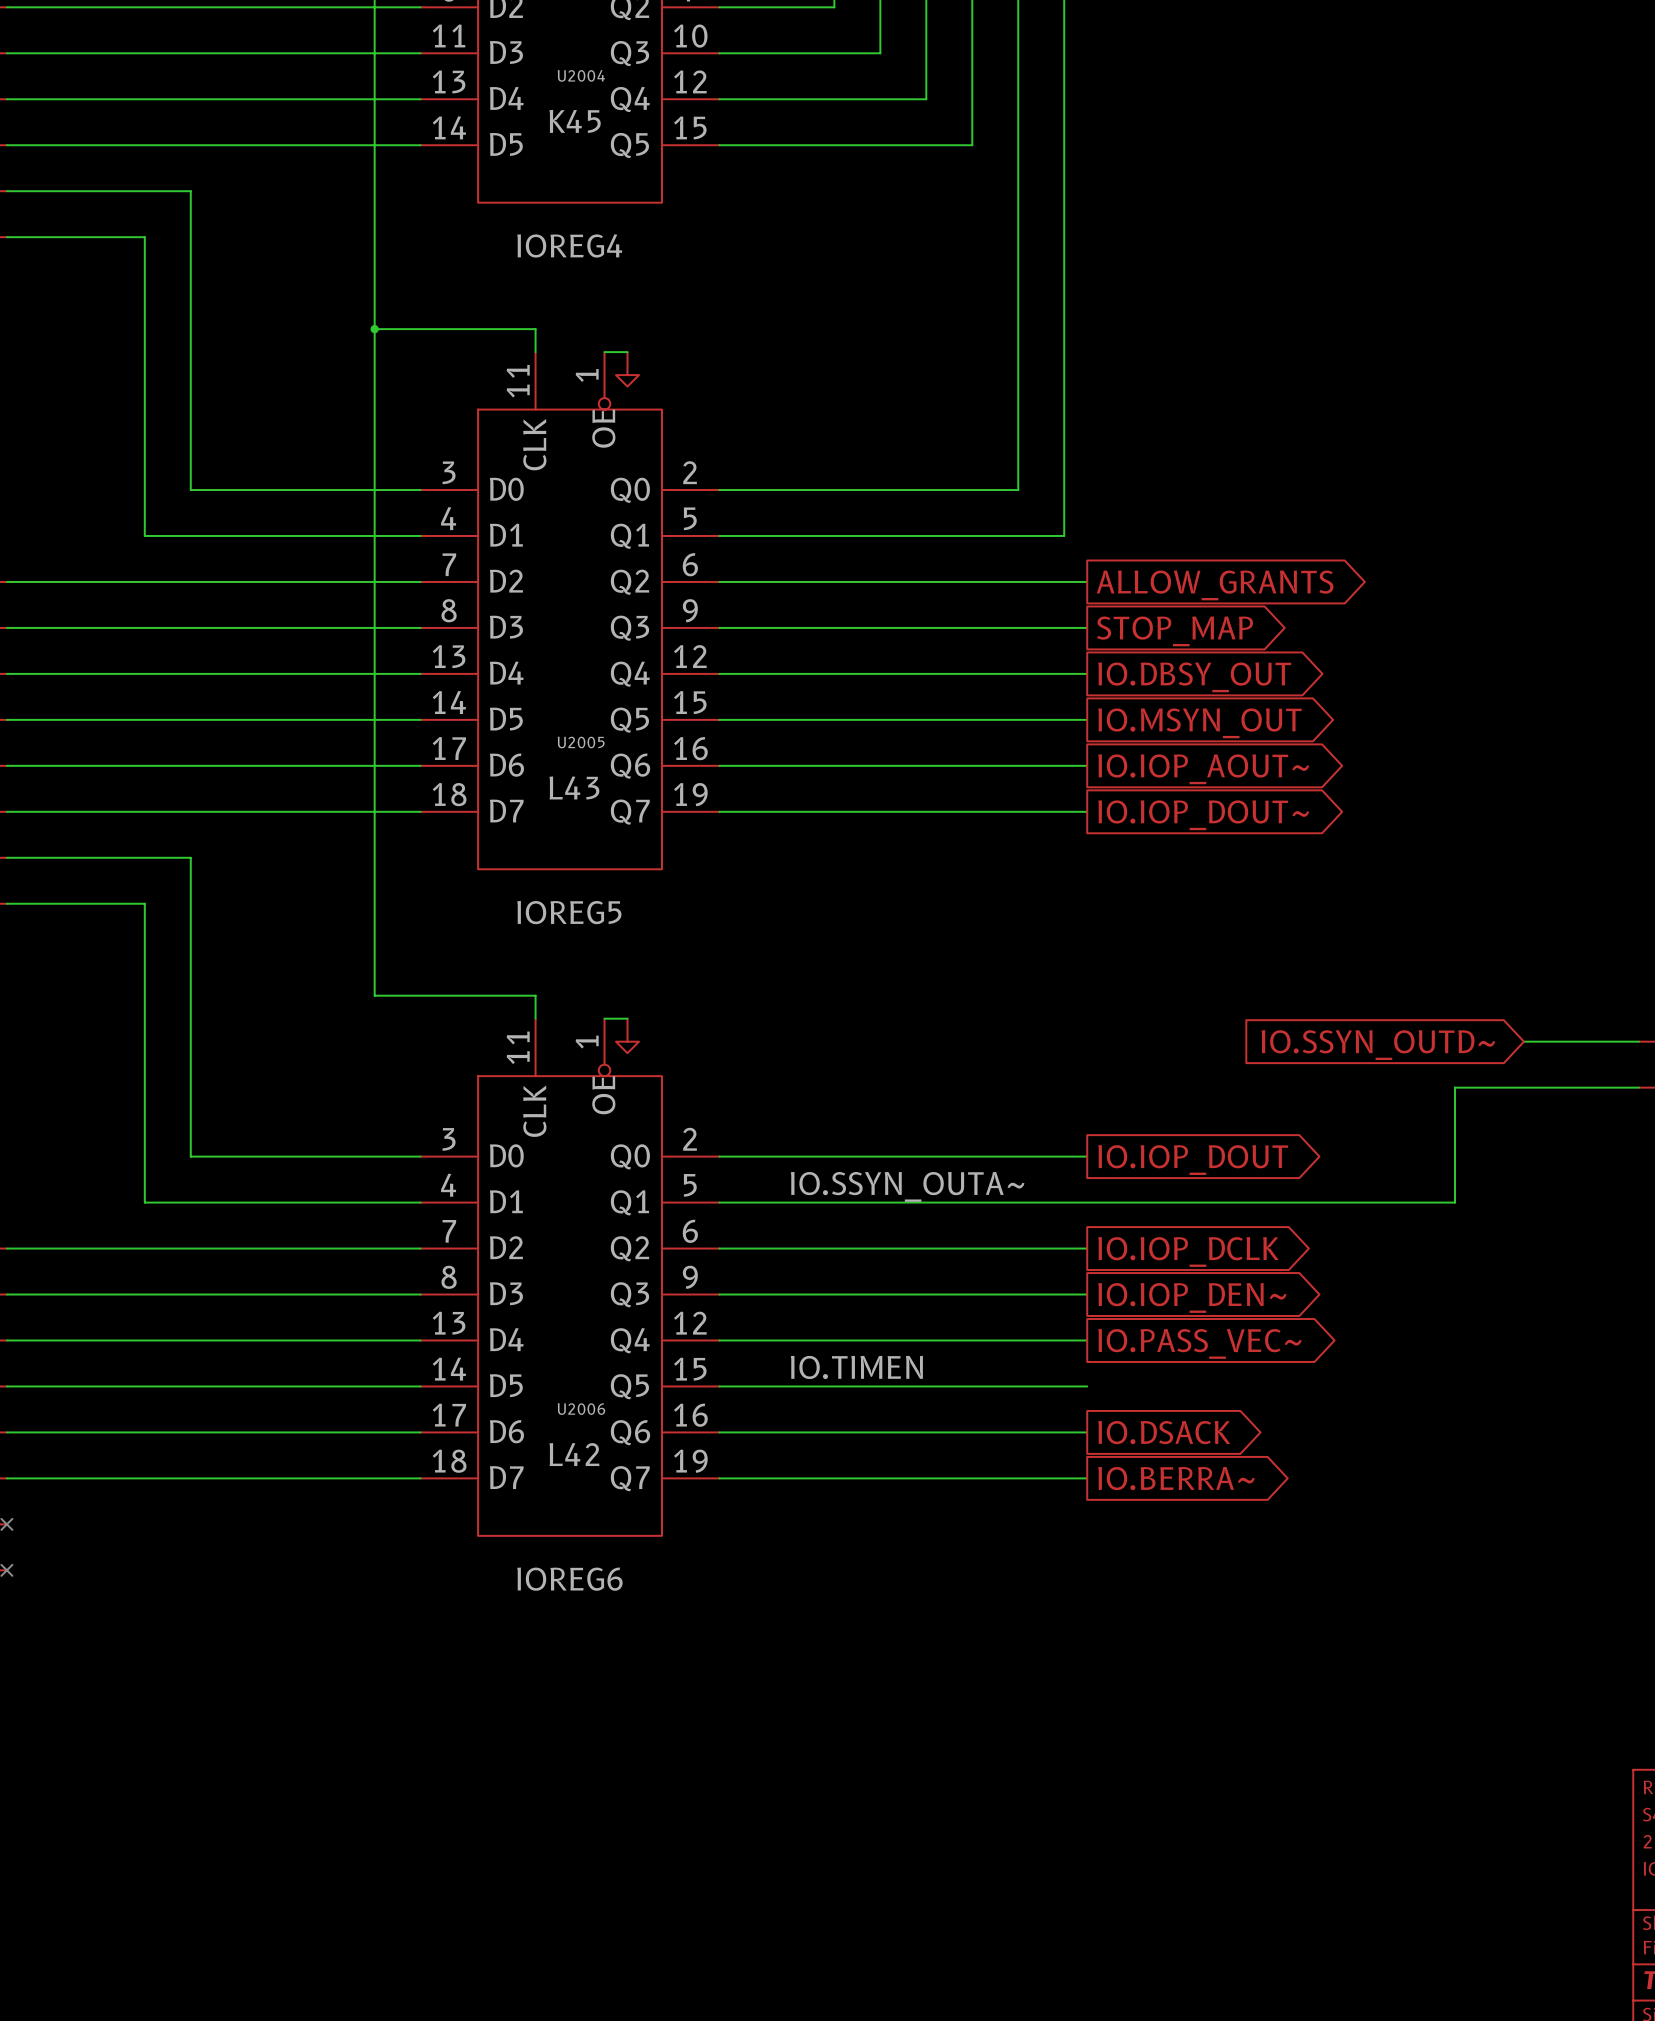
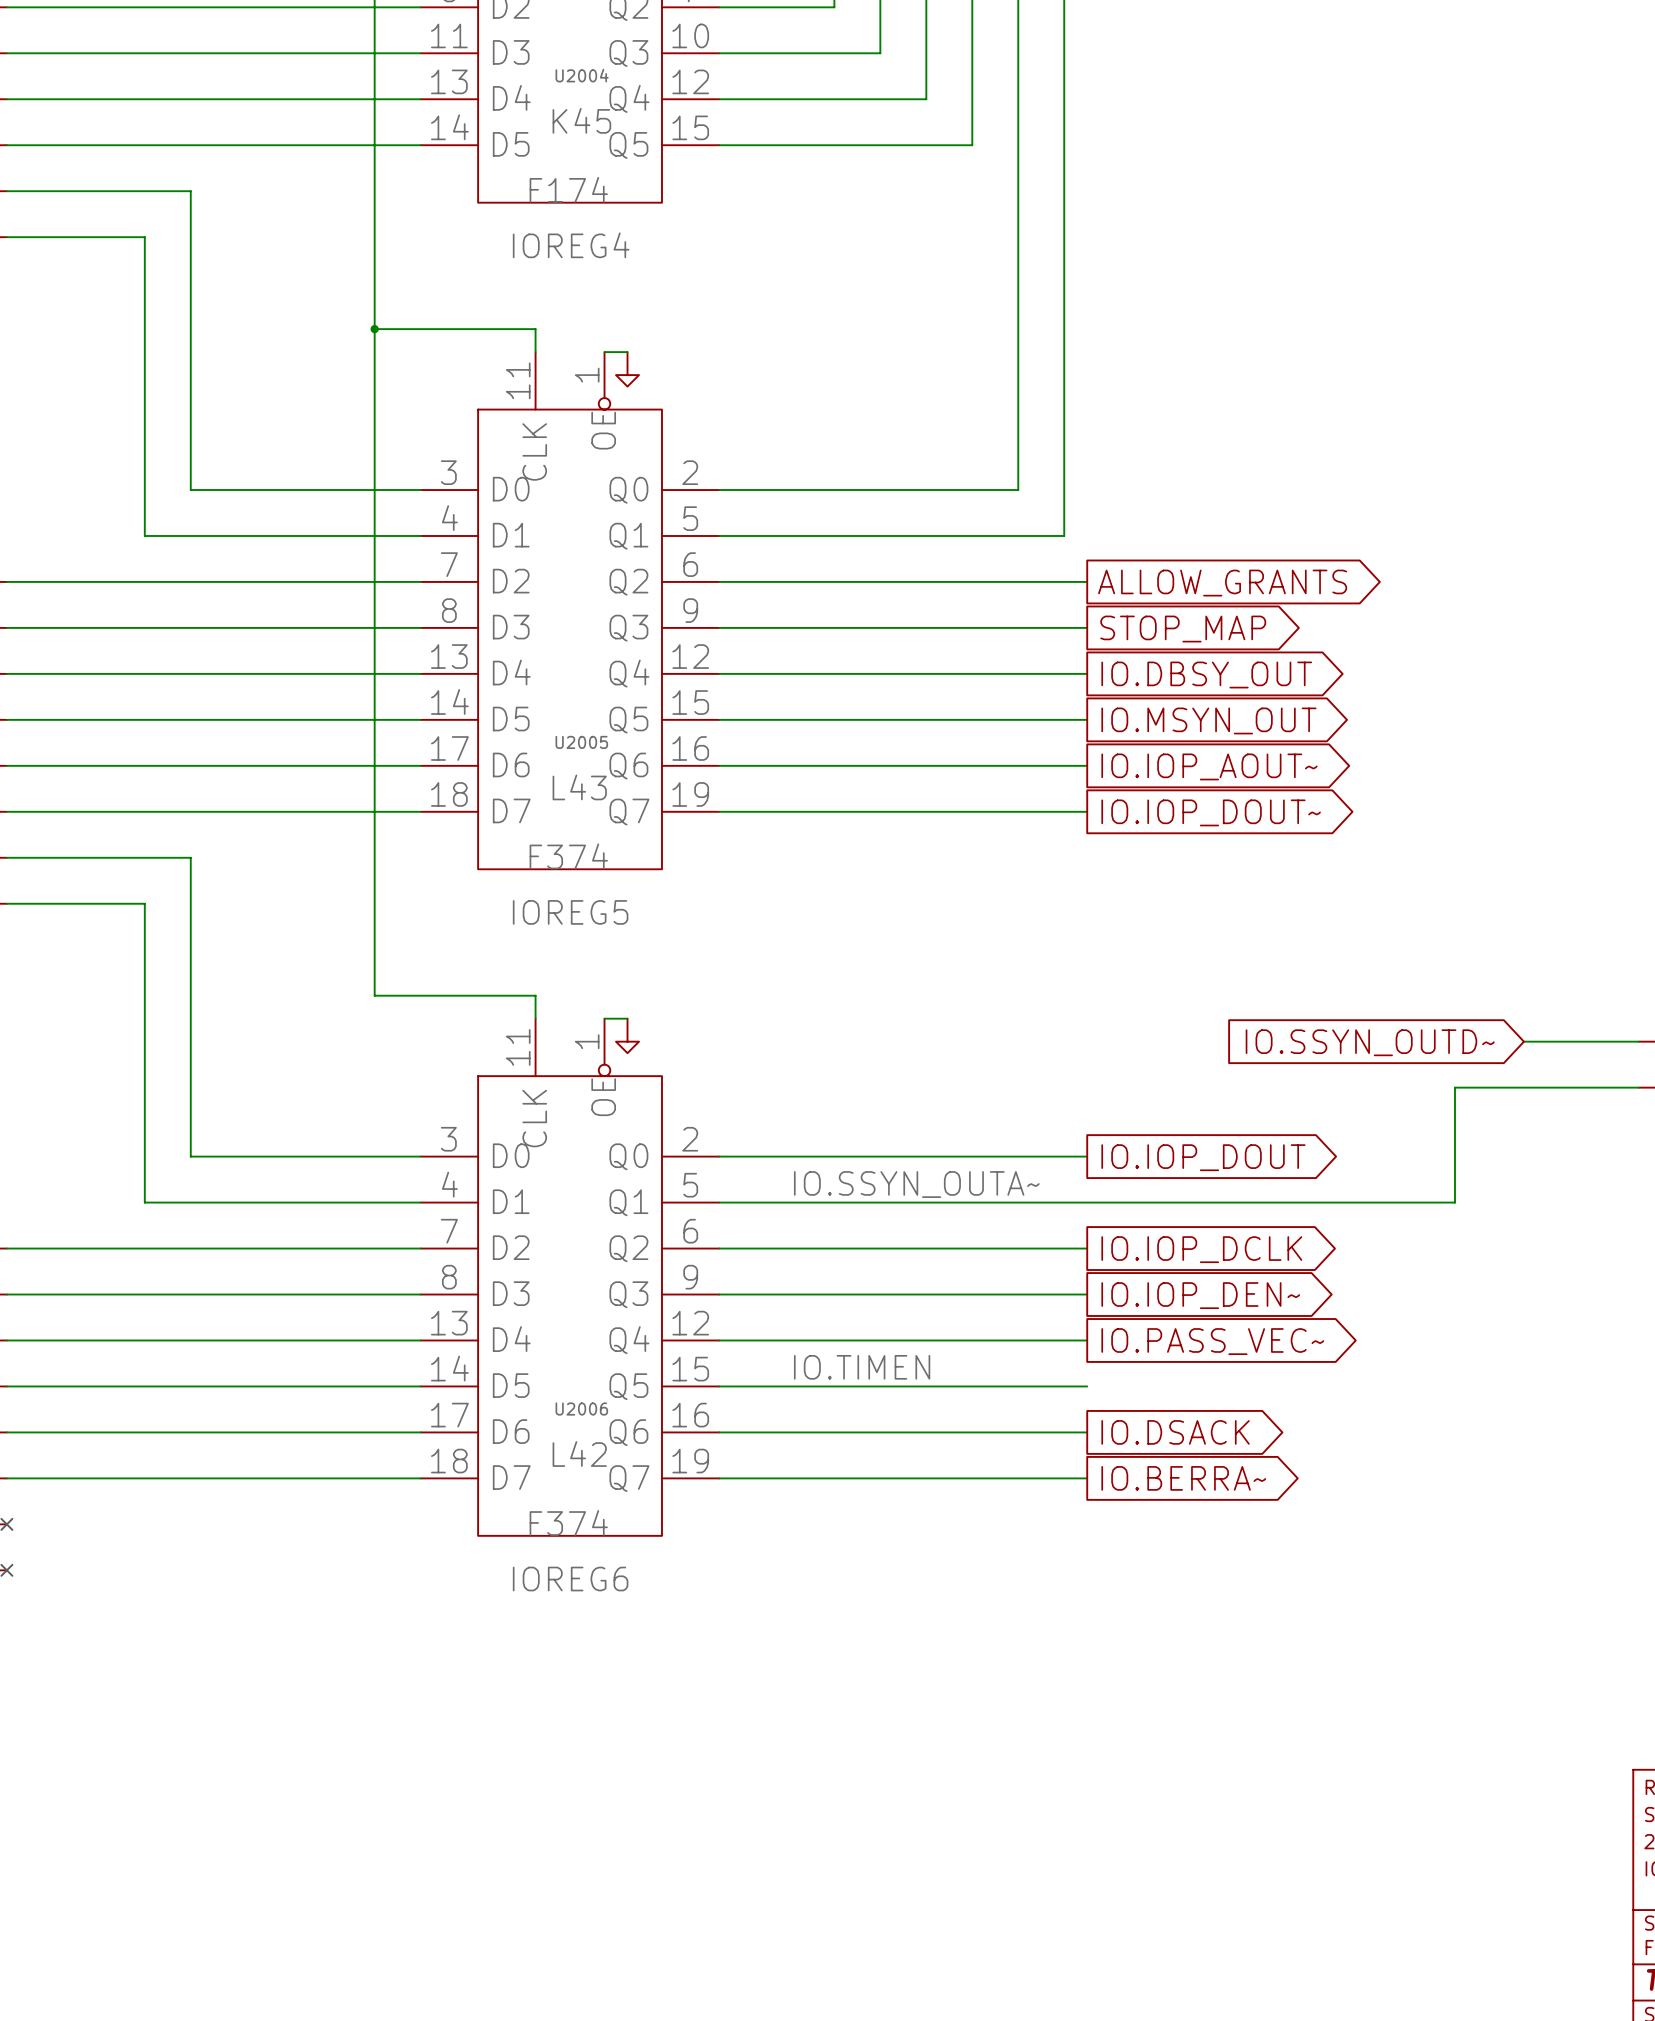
U2004 value: none -> F174 (568, 189)
U2005 value: none -> F374 (568, 856)
U2006 value: none -> F374 (568, 1522)

